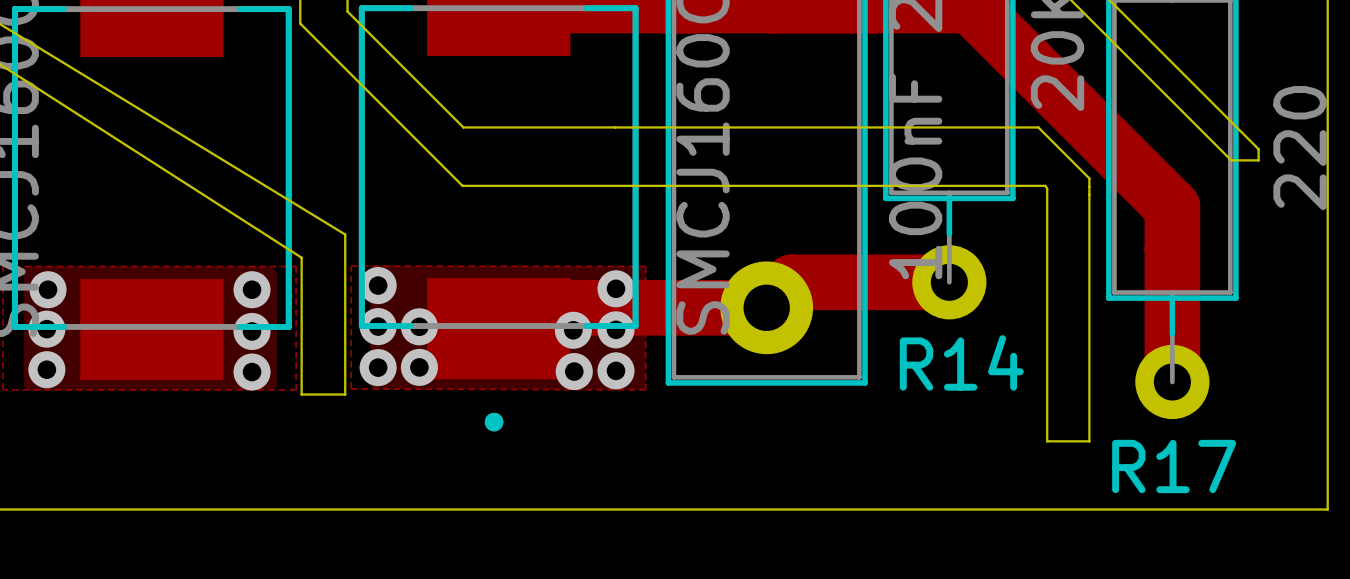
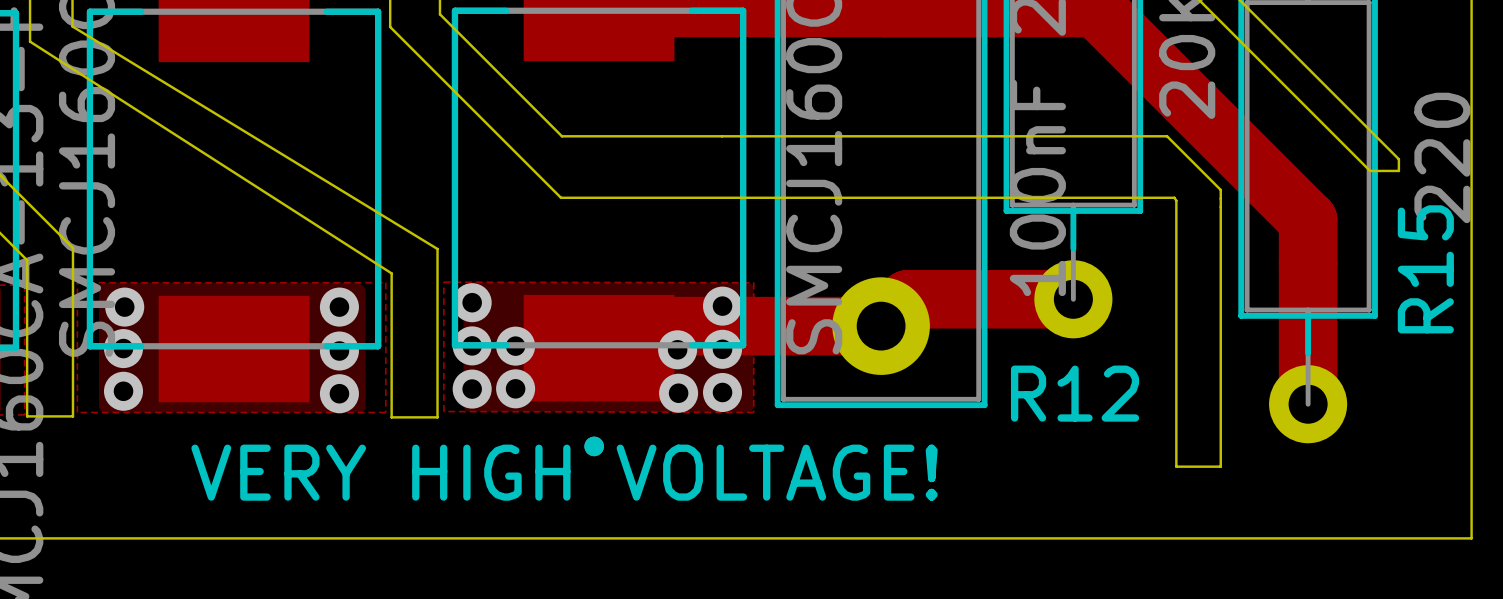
R14 name: R14 (961, 362) -> R12 (1075, 393)
text: none -> VERY HIGH VOLTAGE! (564, 472)
R17 name: R17 (1174, 466) -> R15 (1425, 269)

